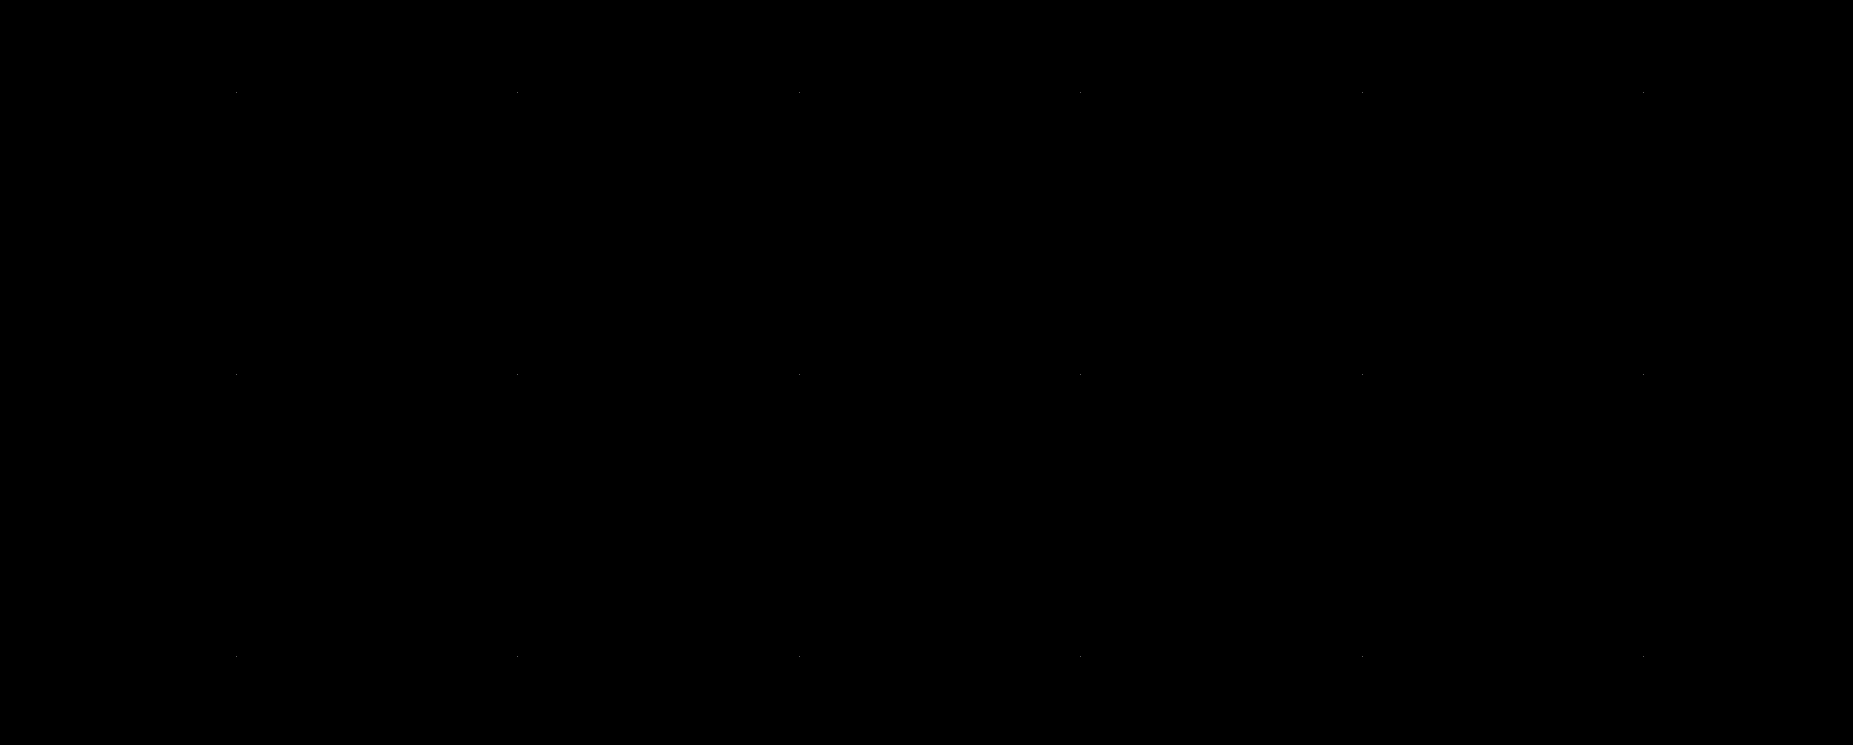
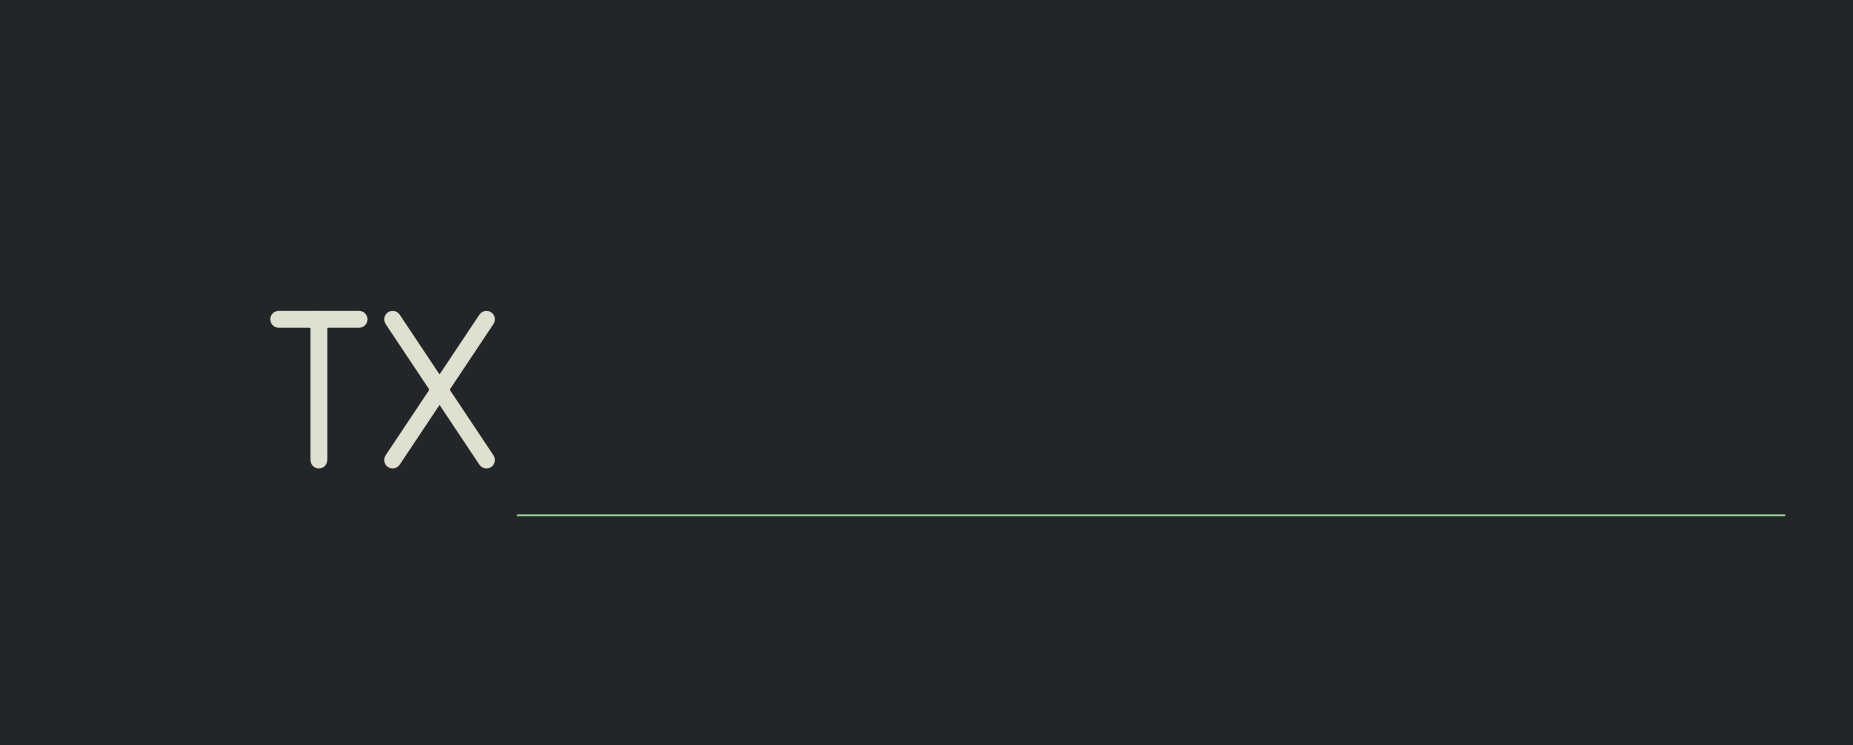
label: none -> TX (382, 389)
wire: none -> (517, 515) (1784, 515)

